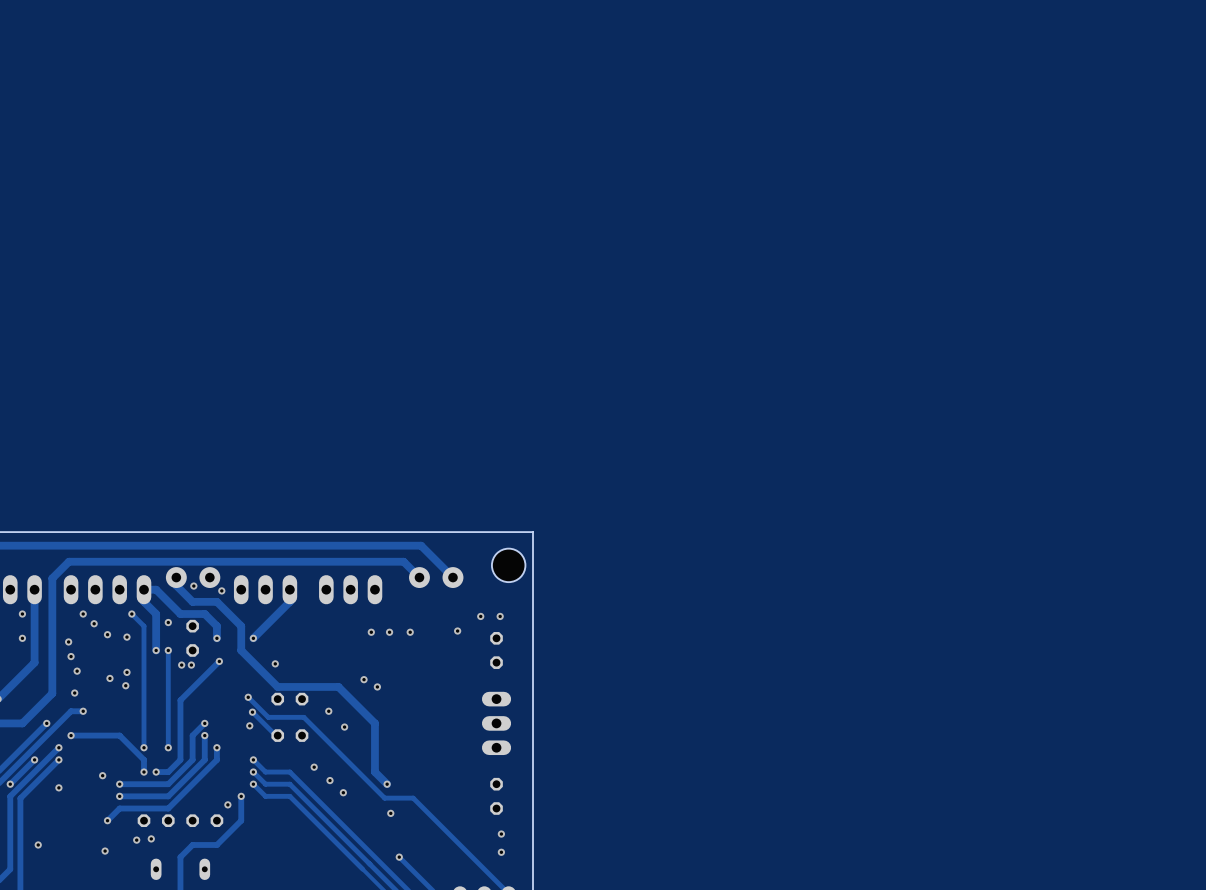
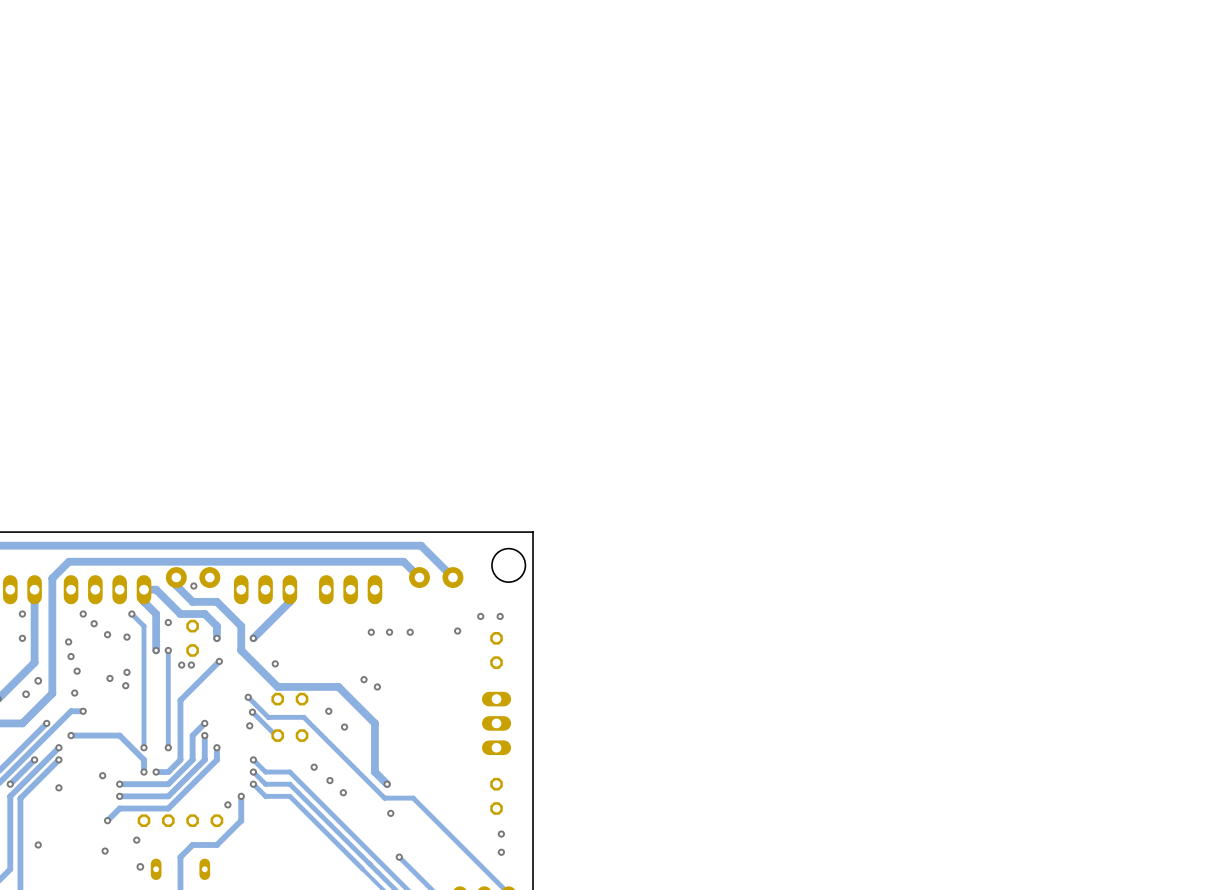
via: (221, 590) -> none
via: none -> (38, 680)
via: none -> (26, 694)
via: (151, 838) -> none
via: none -> (140, 866)

